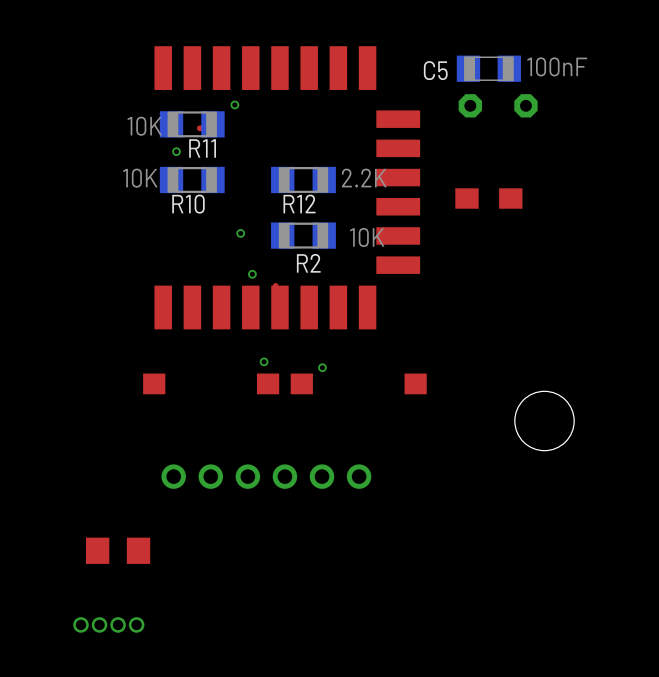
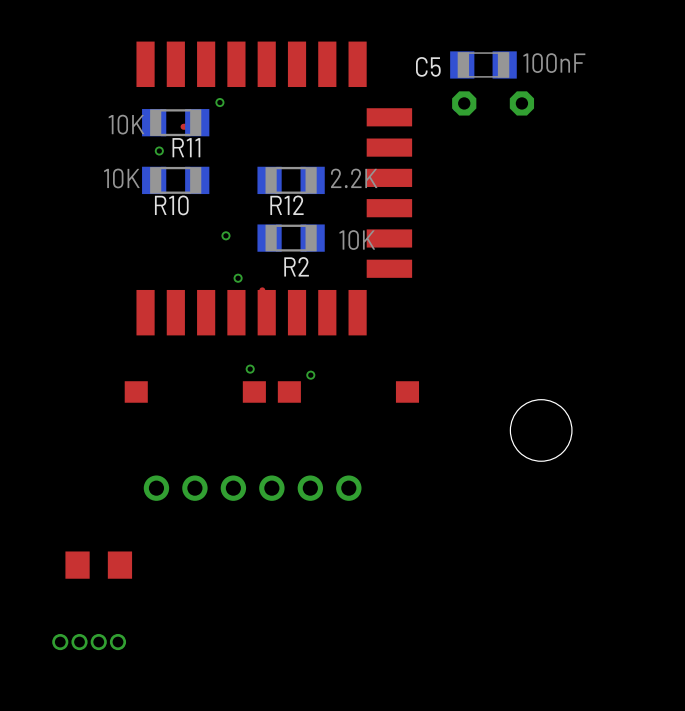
part: (488, 198) -> none

